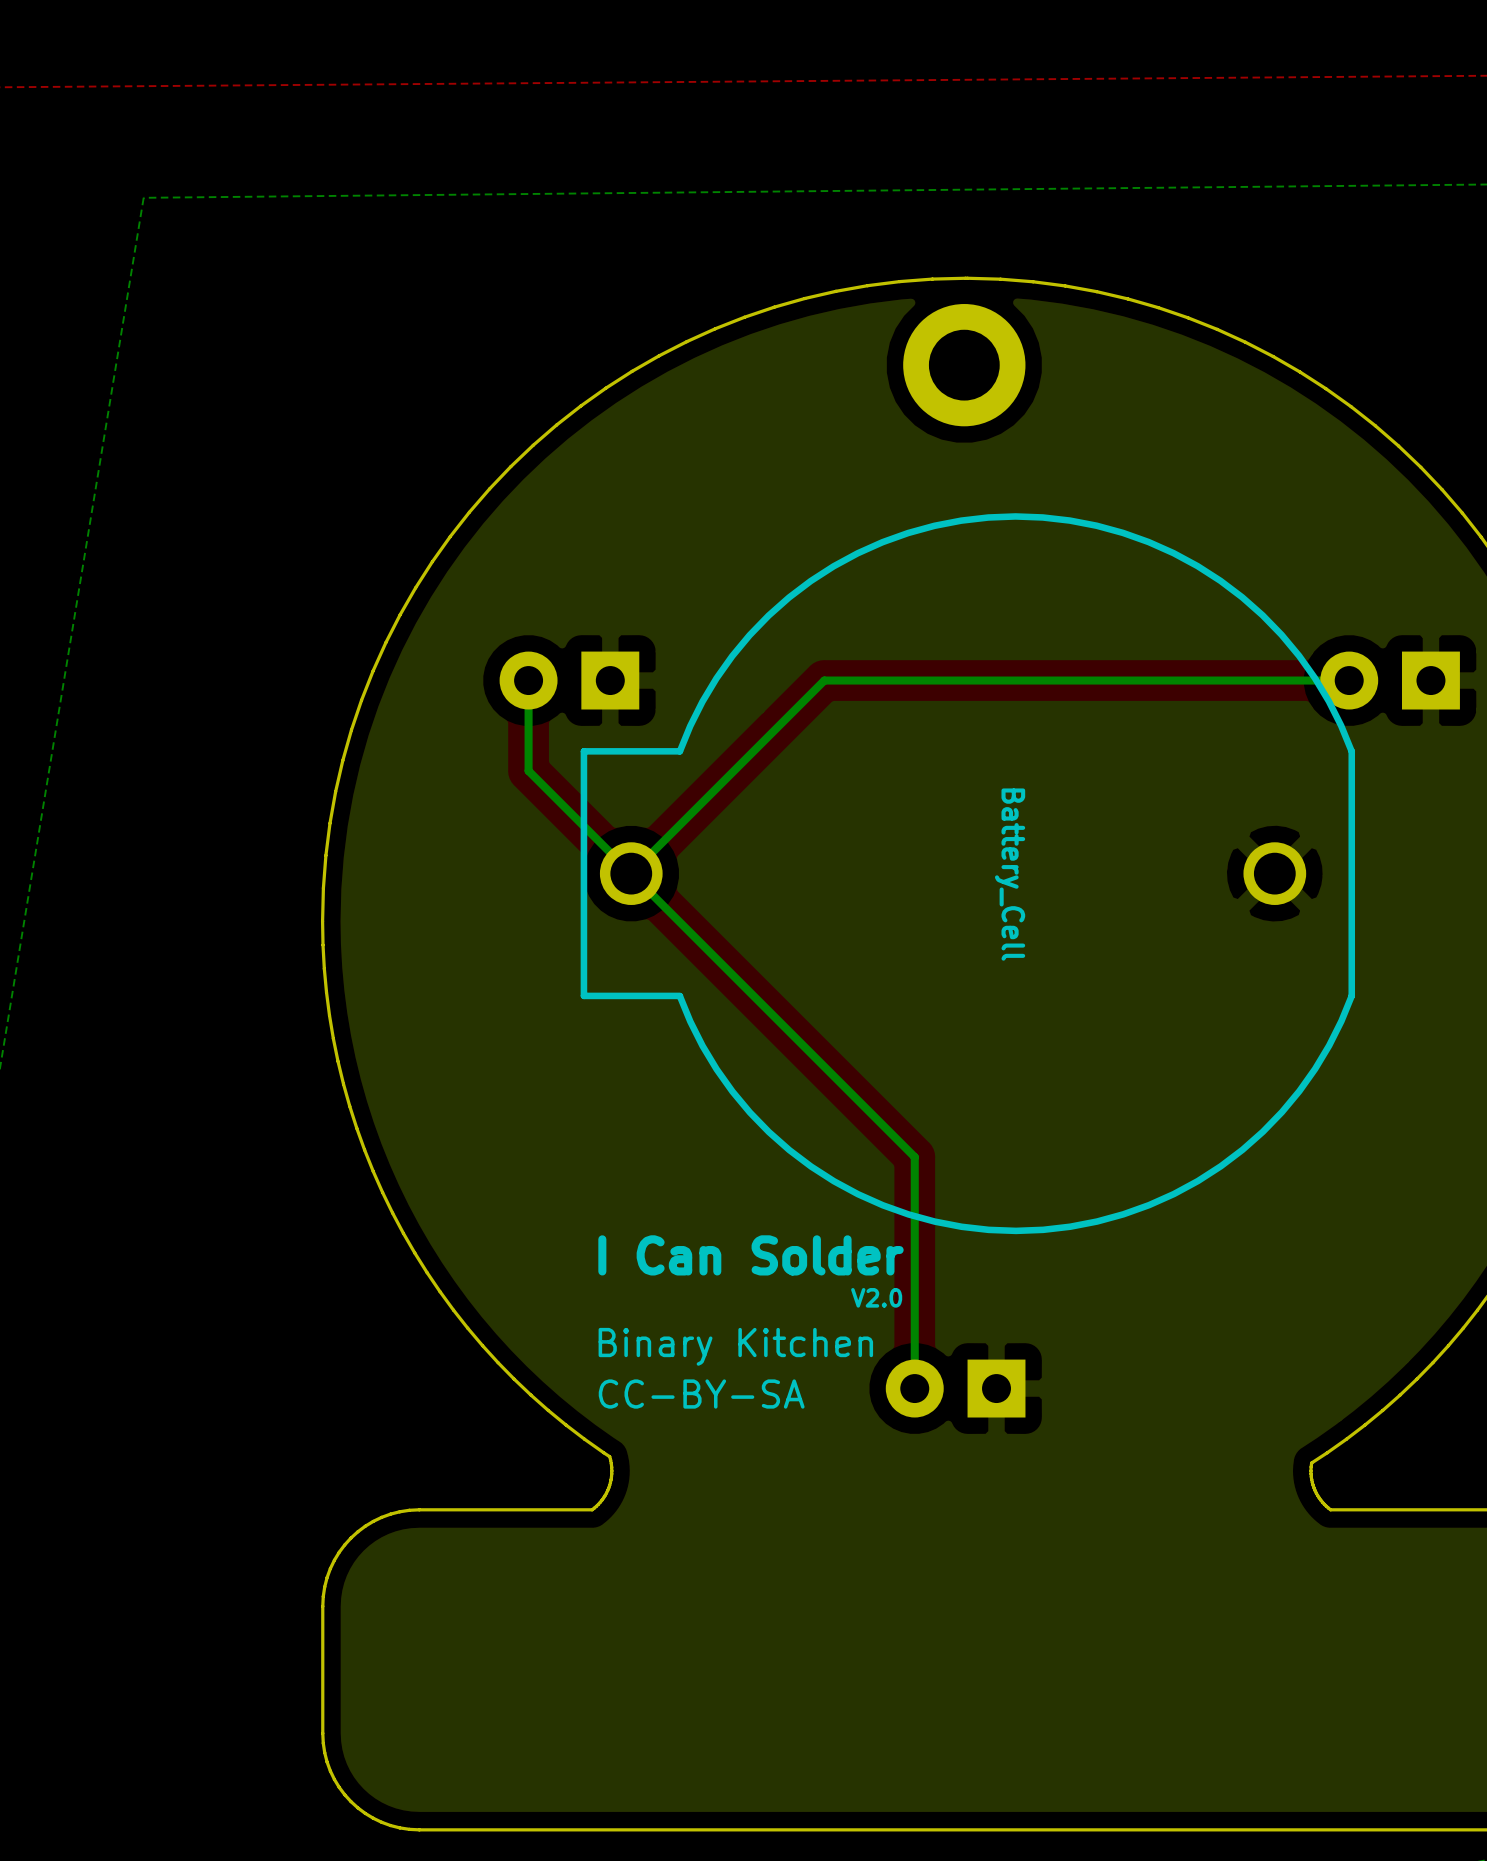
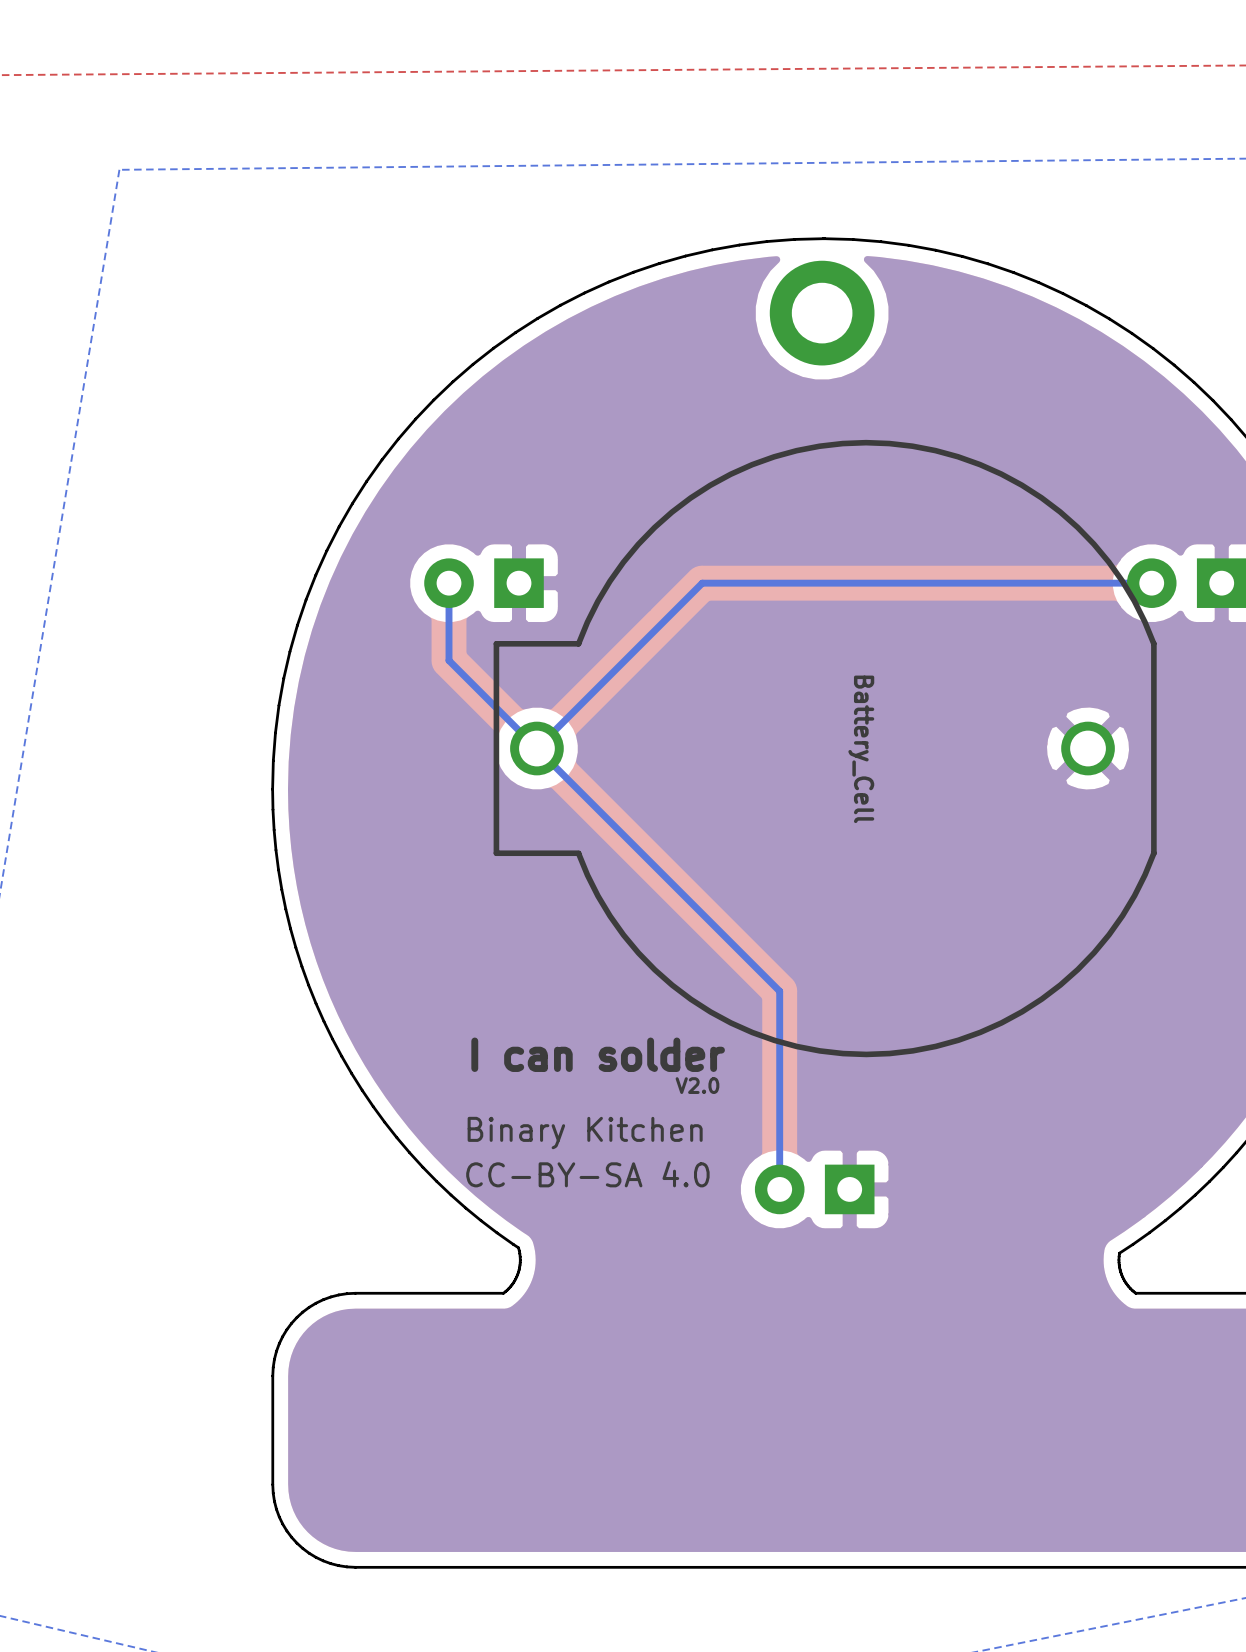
text: I Can Solder (751, 1255) -> I can solder (598, 1054)
text position: V2.0 (876, 1297) -> V2.0 (697, 1085)
text position: Binary Kitchen (735, 1346) -> Binary Kitchen (585, 1133)
text: CC-BY-SA (701, 1394) -> CC-BY-SA 4.0 (587, 1174)

